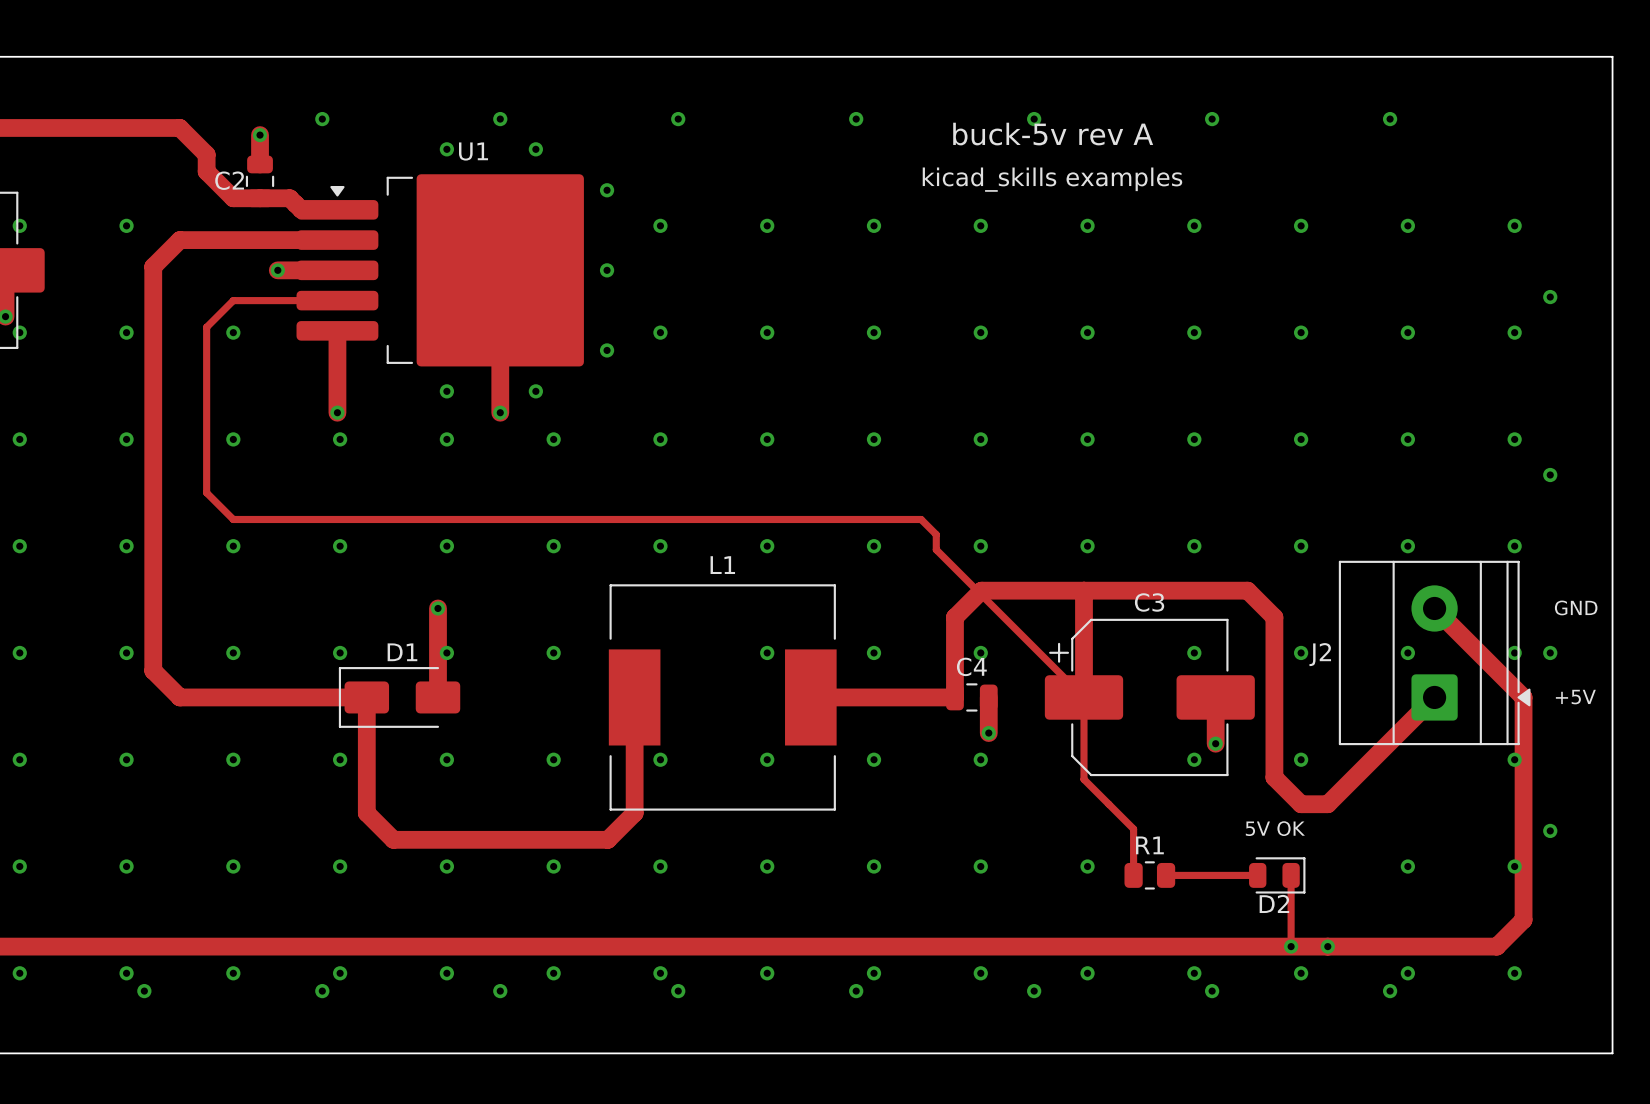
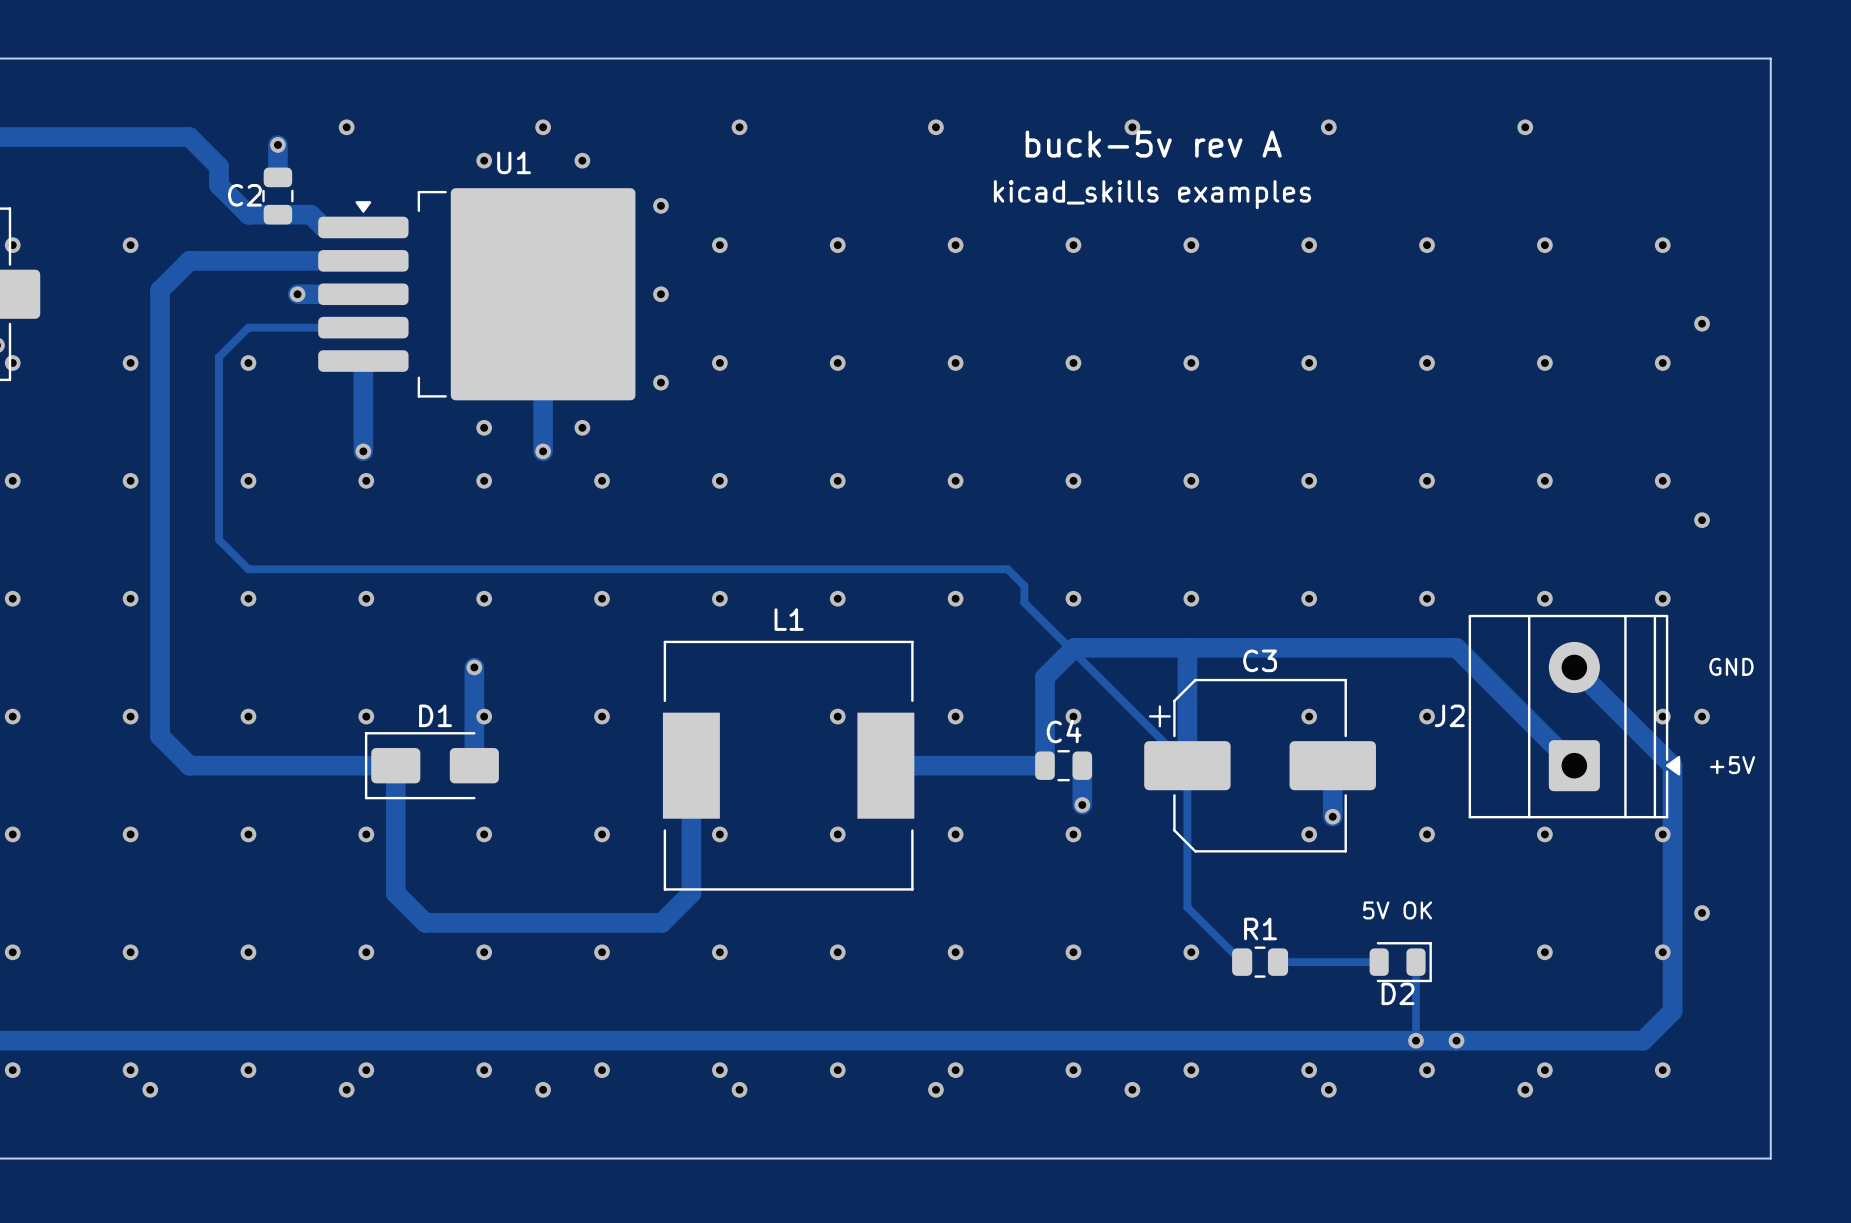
track: (1247, 590) (1274, 617) (1274, 777) (1301, 804) (1327, 804) (1434, 697) -> (1368, 647) (1456, 647) (1574, 765)
via position: (1407, 652) -> (1544, 834)
track: (1083, 779) (1133, 829) (1133, 875) -> (1187, 856) (1187, 907) (1242, 962)

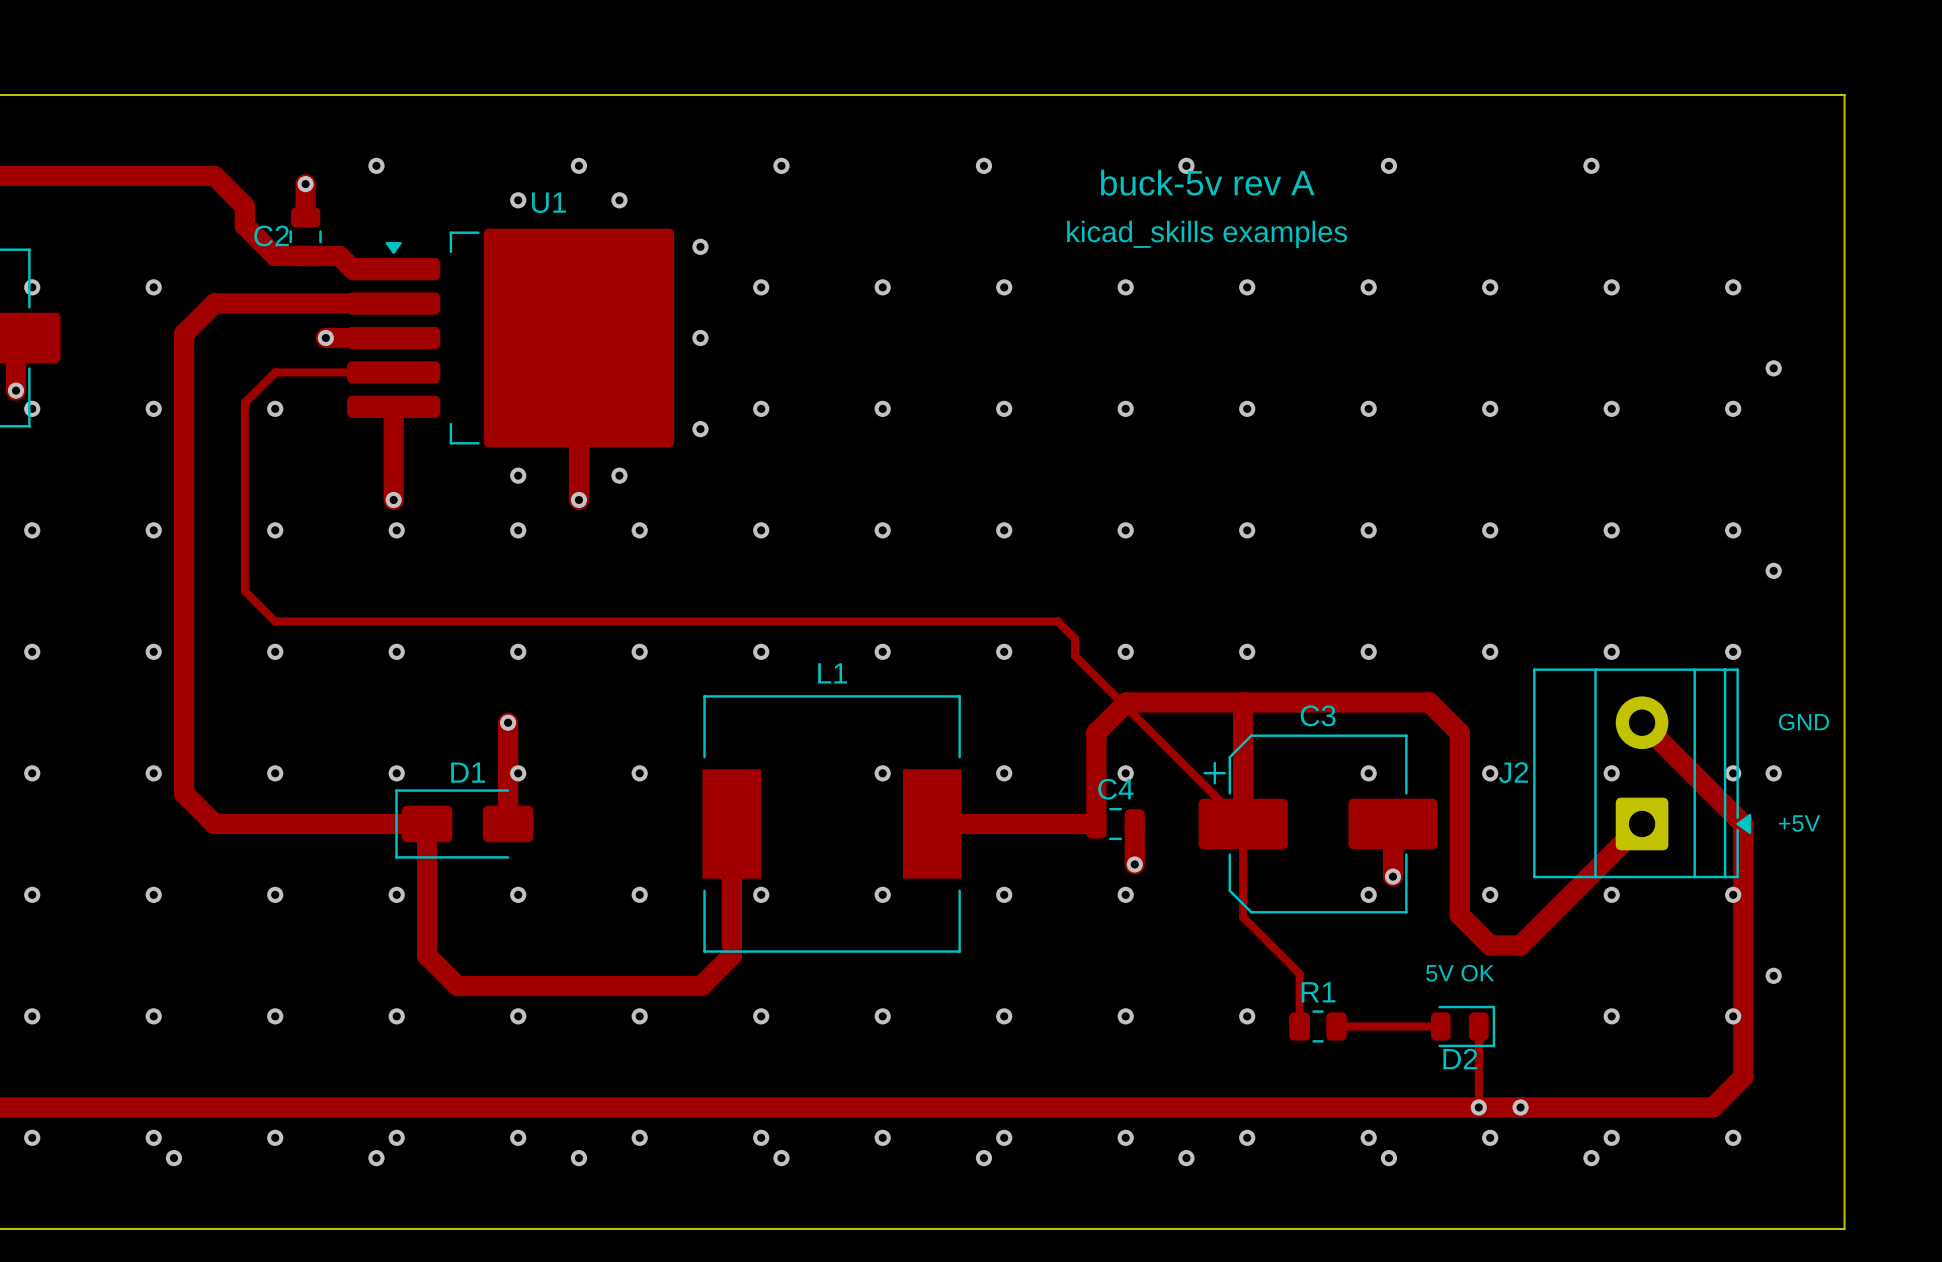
track: (1368, 647) (1456, 647) (1574, 765) -> (1429, 702) (1459, 732) (1459, 915) (1490, 945) (1520, 945) (1642, 823)
via: none -> (1611, 773)
track: (1187, 856) (1187, 907) (1242, 962) -> (1243, 917) (1299, 973) (1299, 1026)

